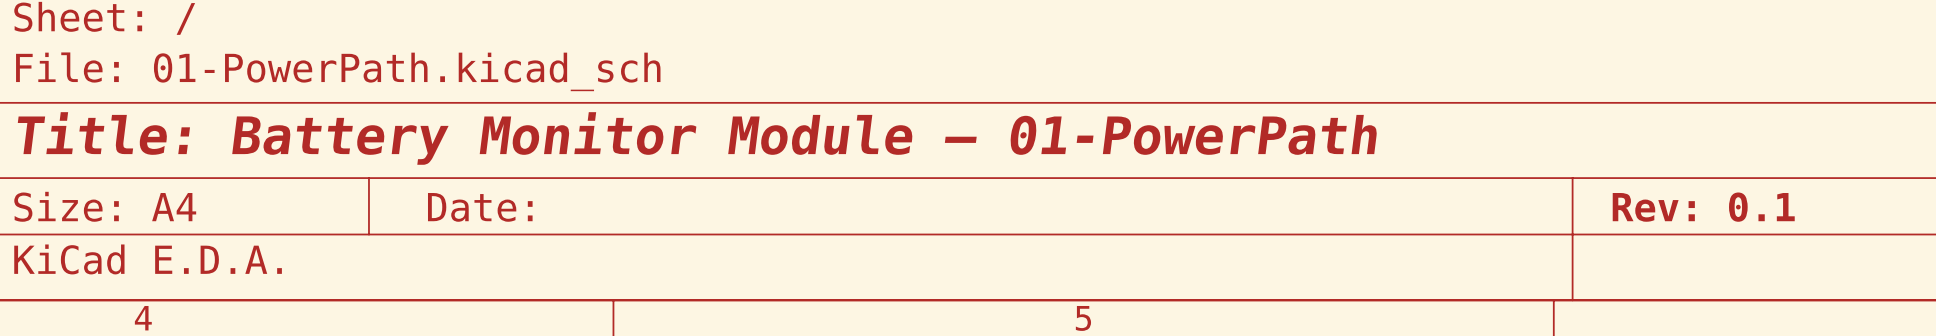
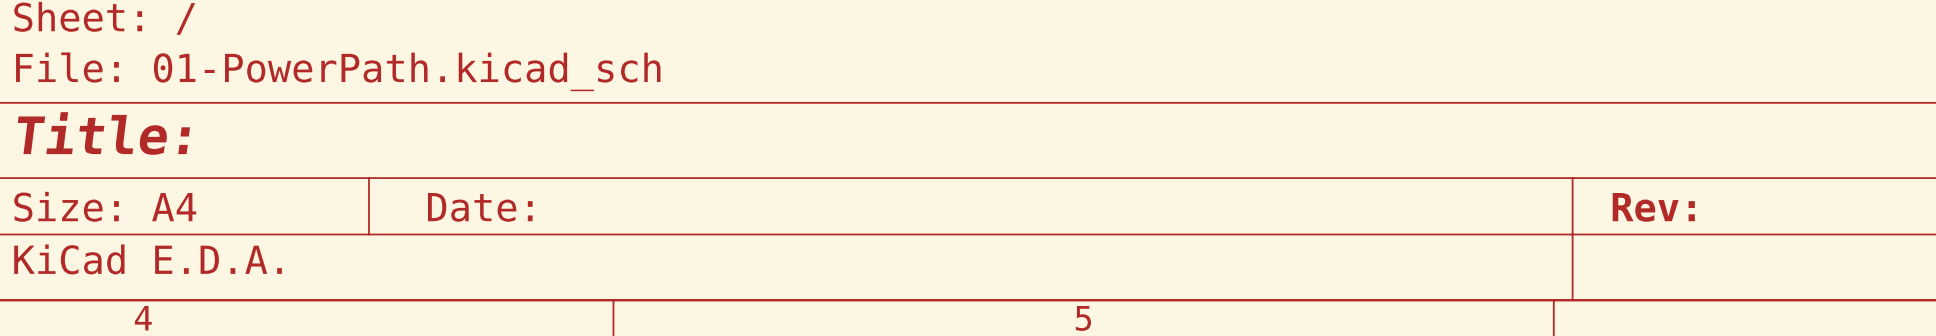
title block: Title: Battery Monitor Module — 01-PowerPath (697, 138) -> Title: (103, 133)
title block: Rev: 0.1 (1703, 207) -> Rev: (1653, 207)

